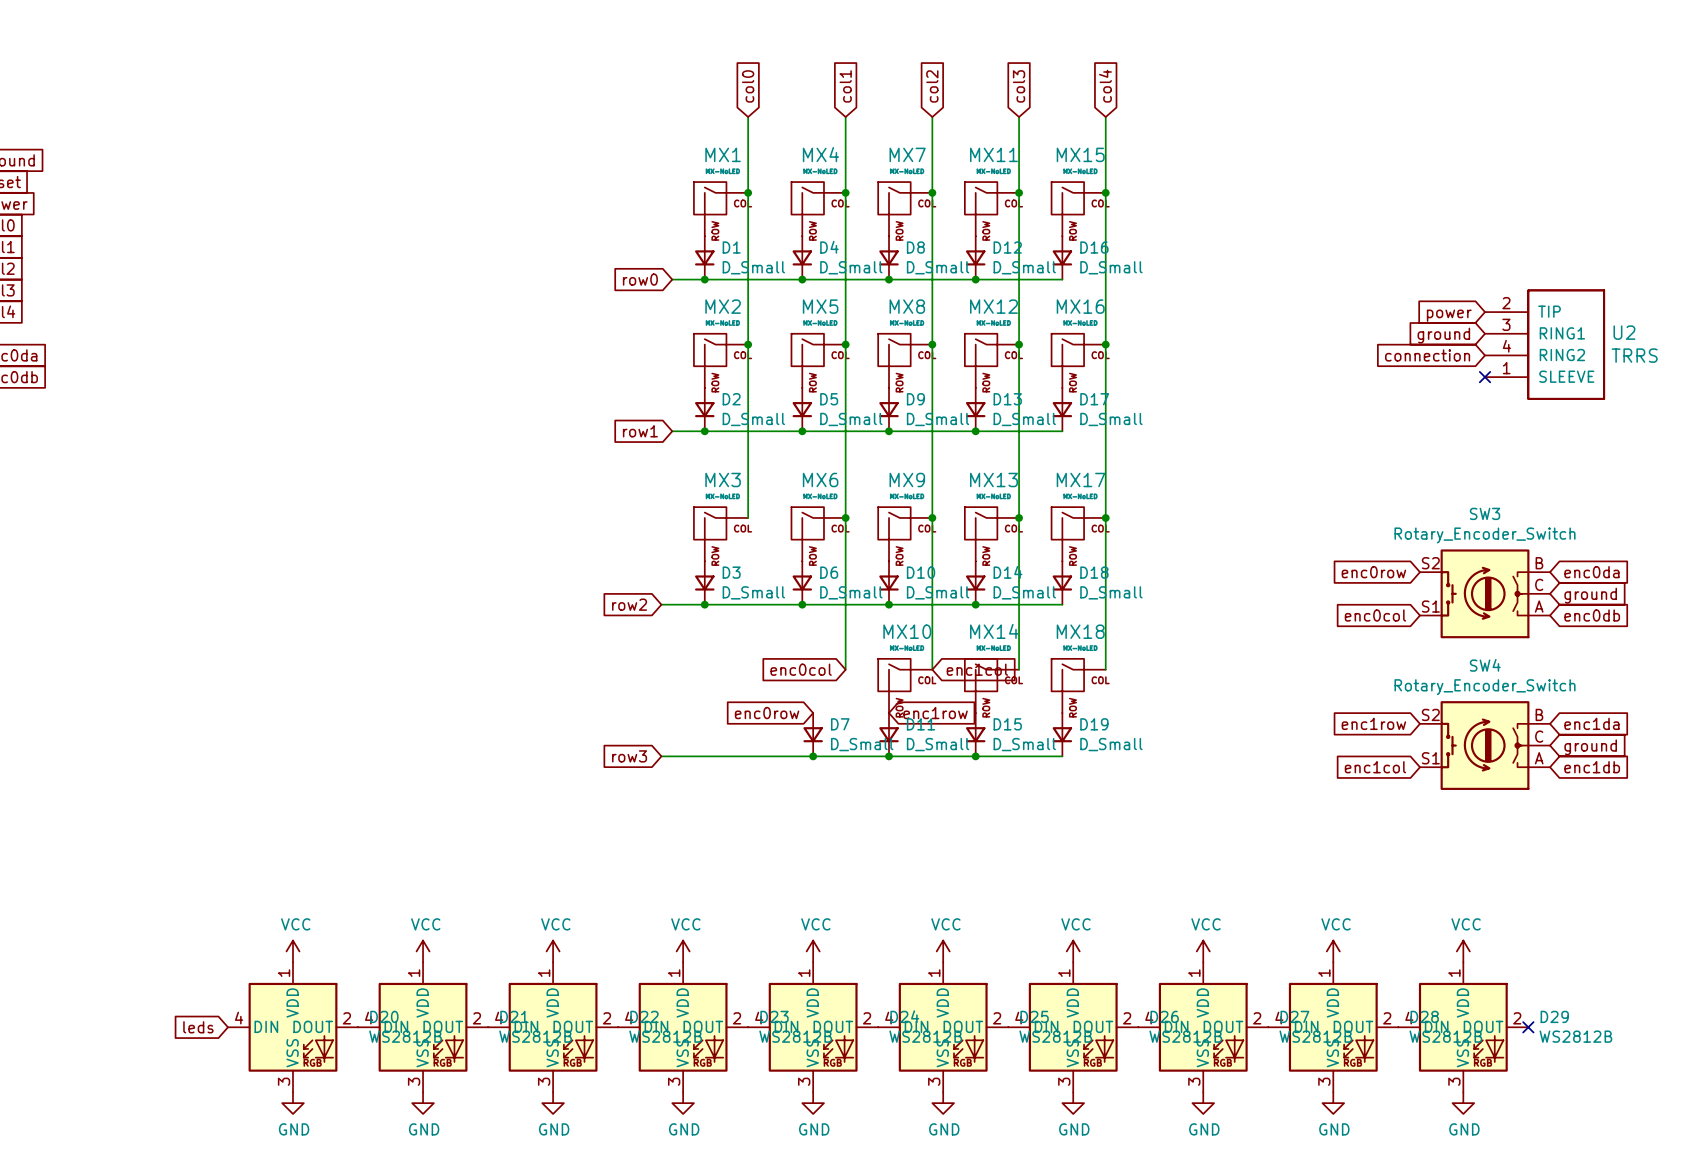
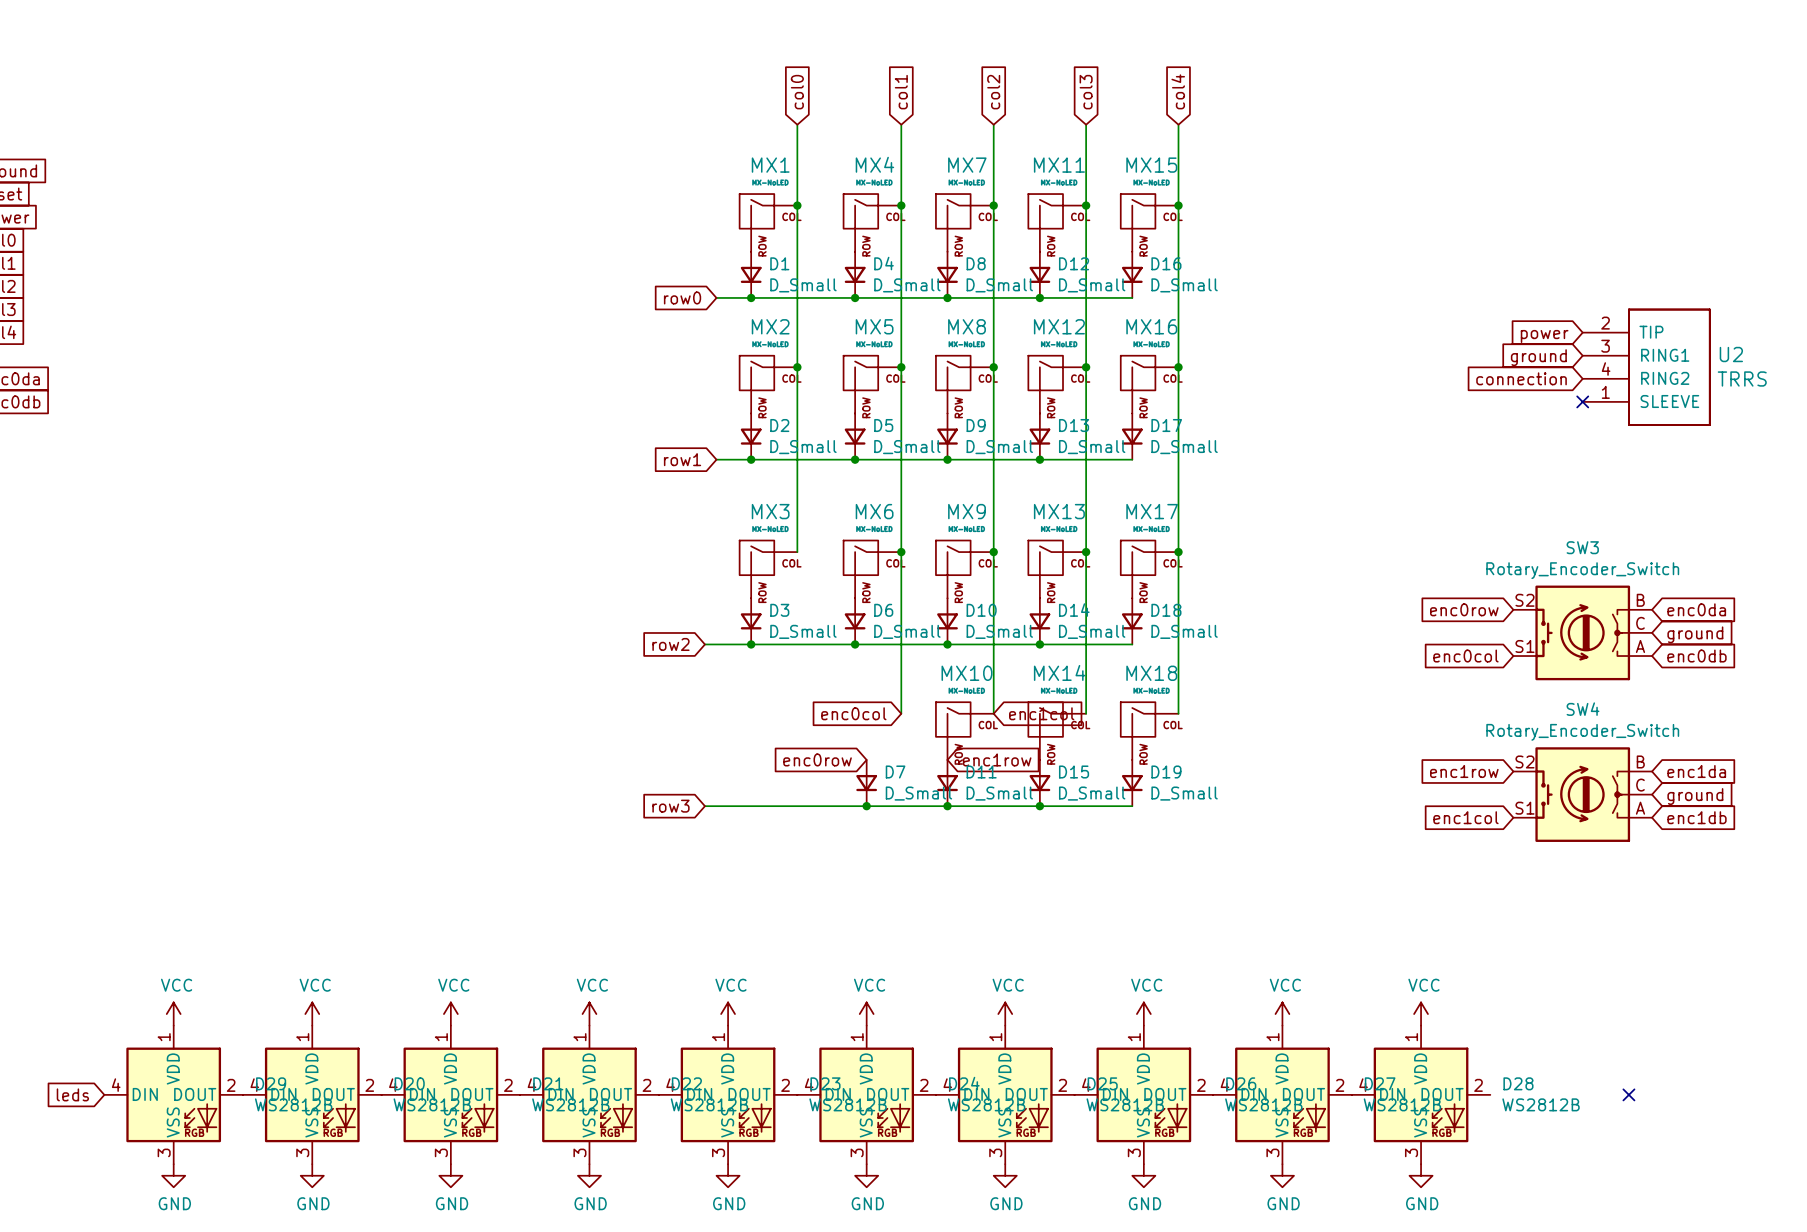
power symbol: none -> VCC (173, 1014)
power symbol: VCC (1463, 951) -> none
global label position: leds (198, 1027) -> leds (72, 1094)
D29 position: (1463, 1027) -> (173, 1094)
power symbol: none -> GND (173, 1175)
power symbol: GND (1463, 1103) -> none

